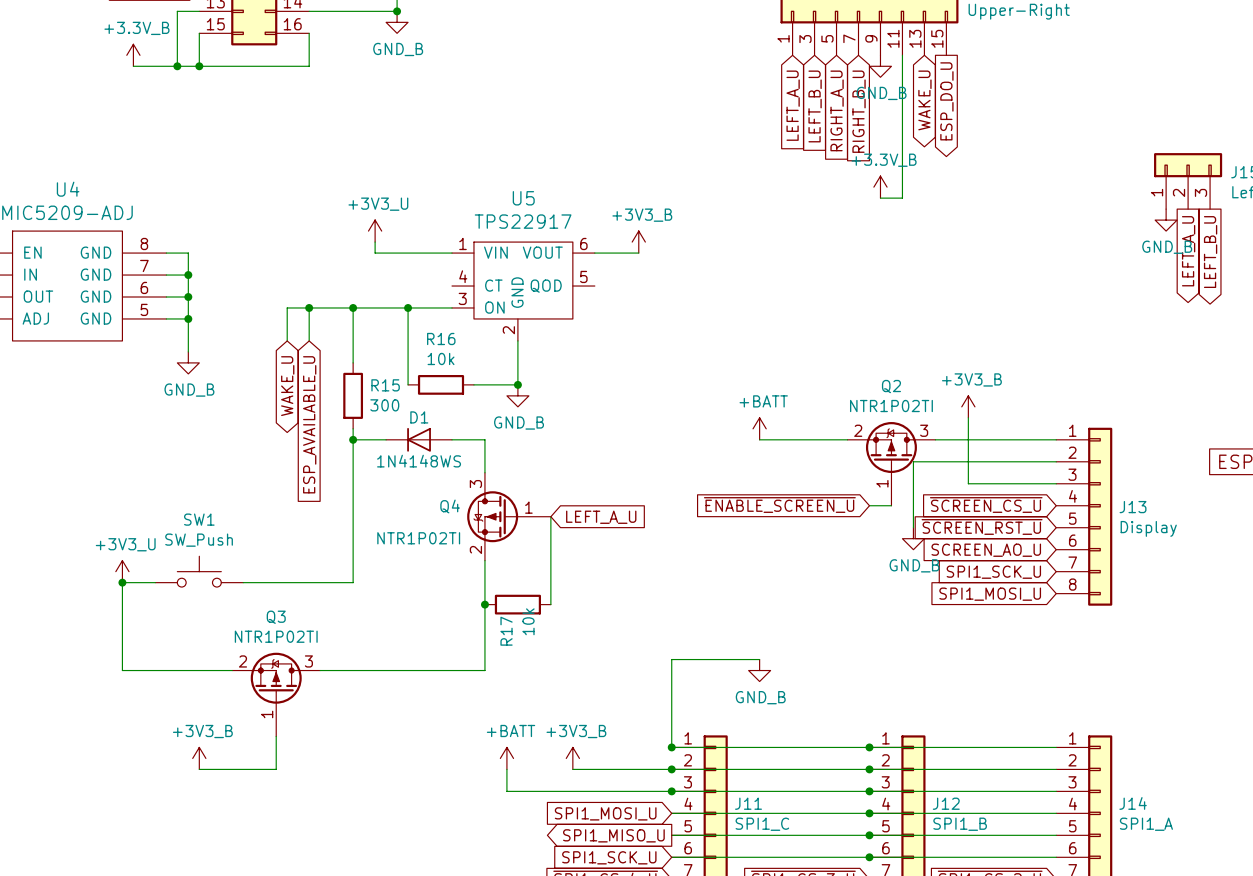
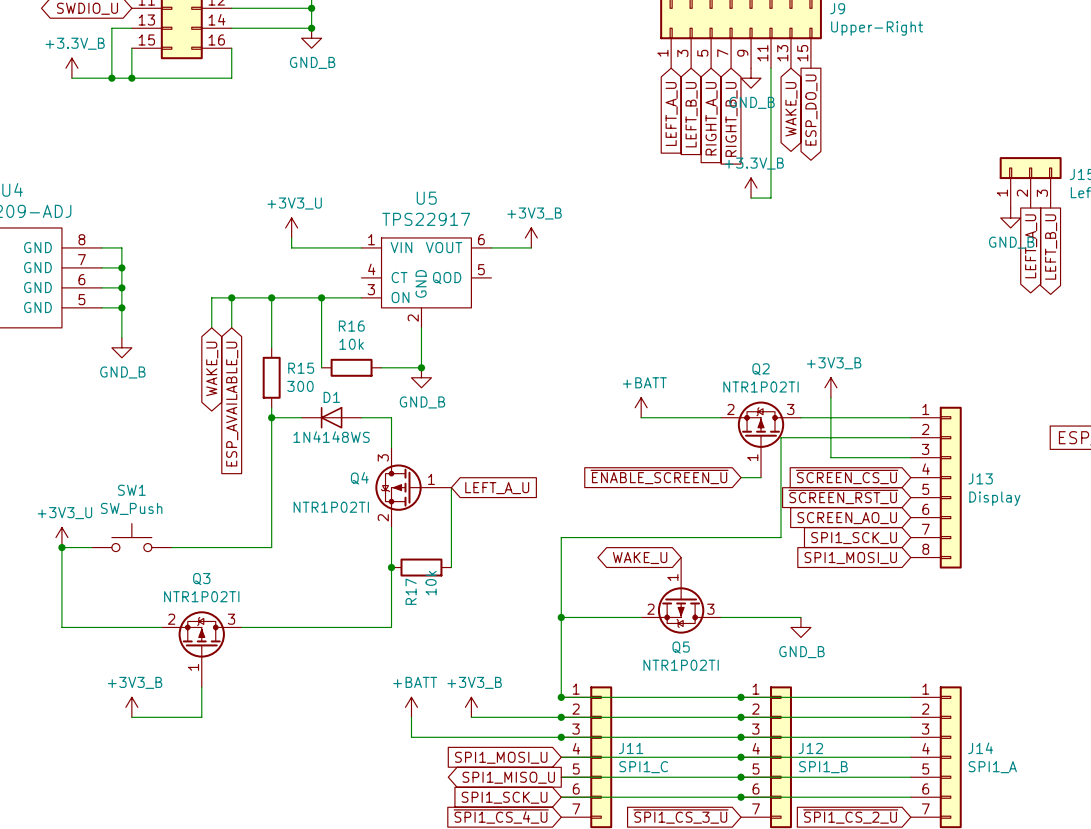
wire: none -> (780, 497) (780, 537) (561, 537) (561, 617)
power symbol: GND_B (913, 538) -> none
global label: none -> WAKE_U (640, 558)
Q5: none -> NTR1P02TI (681, 595)
junction: none -> (561, 617)
wire: none -> (721, 617) (800, 617)
power symbol: GND_B (759, 670) -> none
power symbol: none -> GND_B (800, 627)

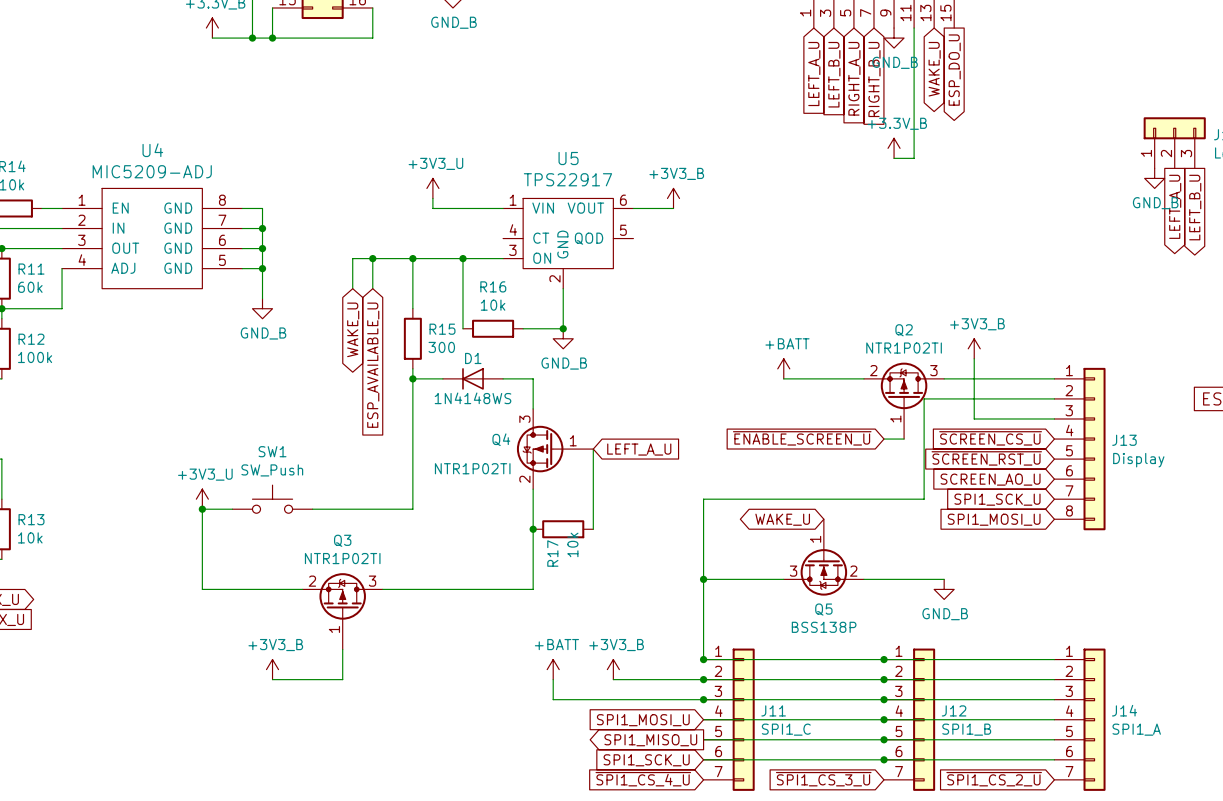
Q5 symbol: [641, 557, 722, 634] -> [783, 519, 864, 596]
Q5 value: NTR1P02TI (681, 665) -> BSS138P (824, 627)

